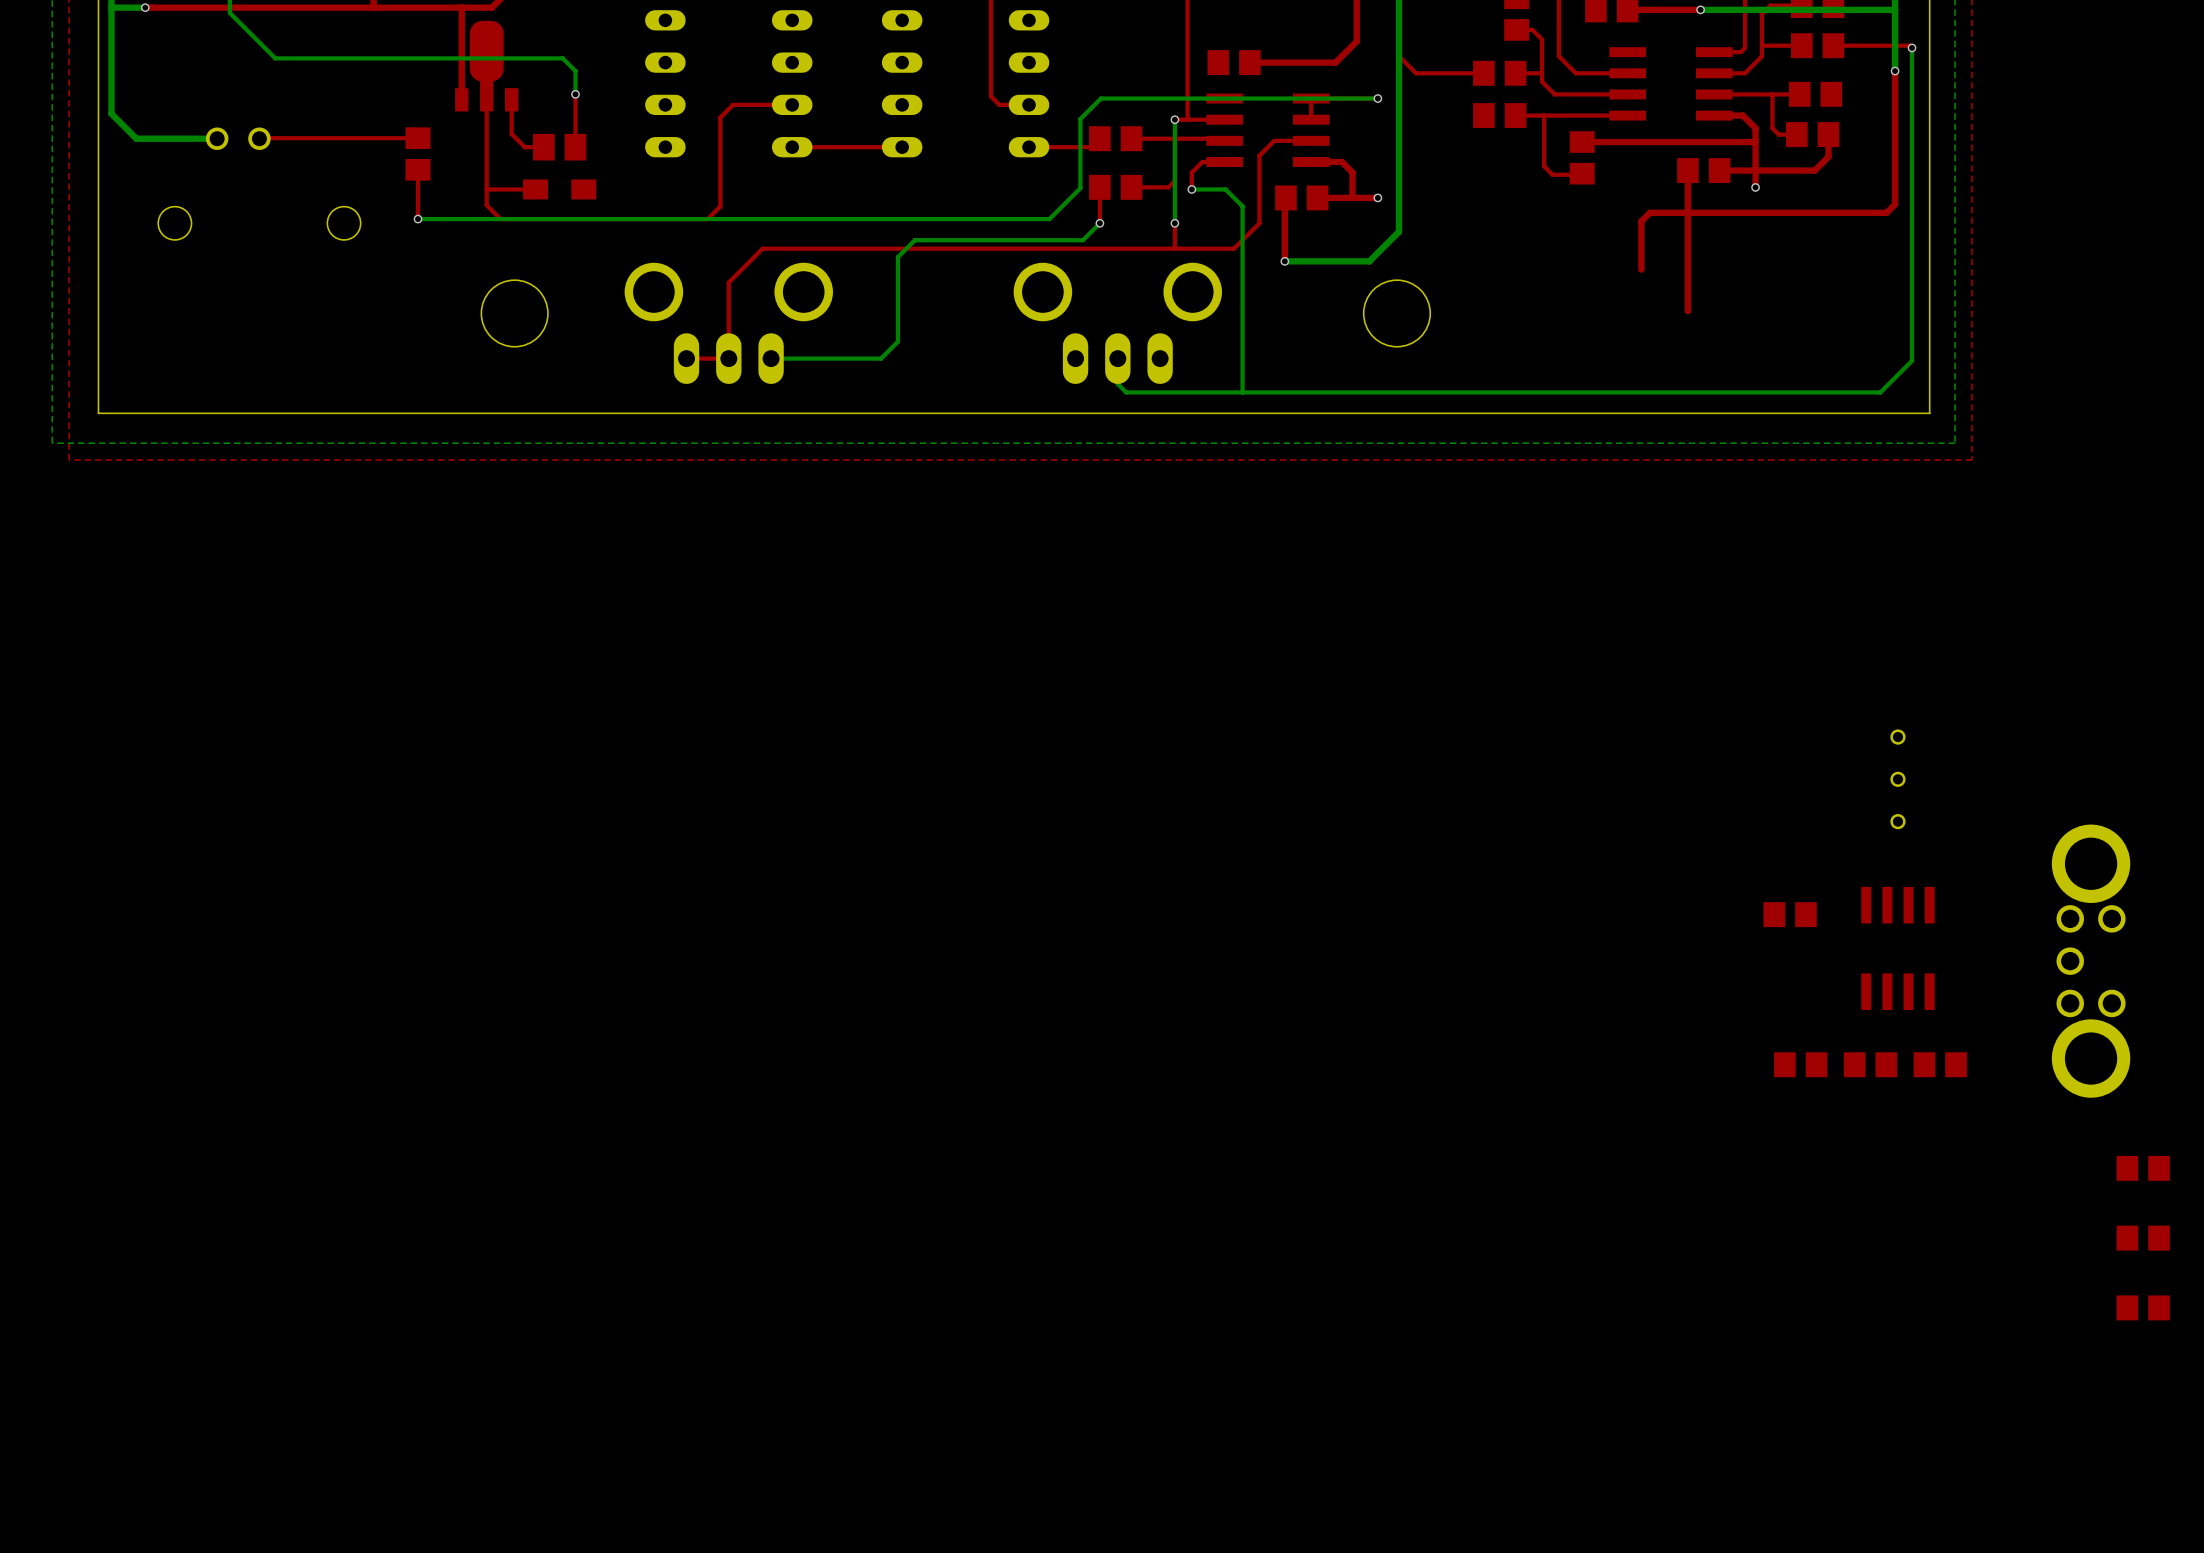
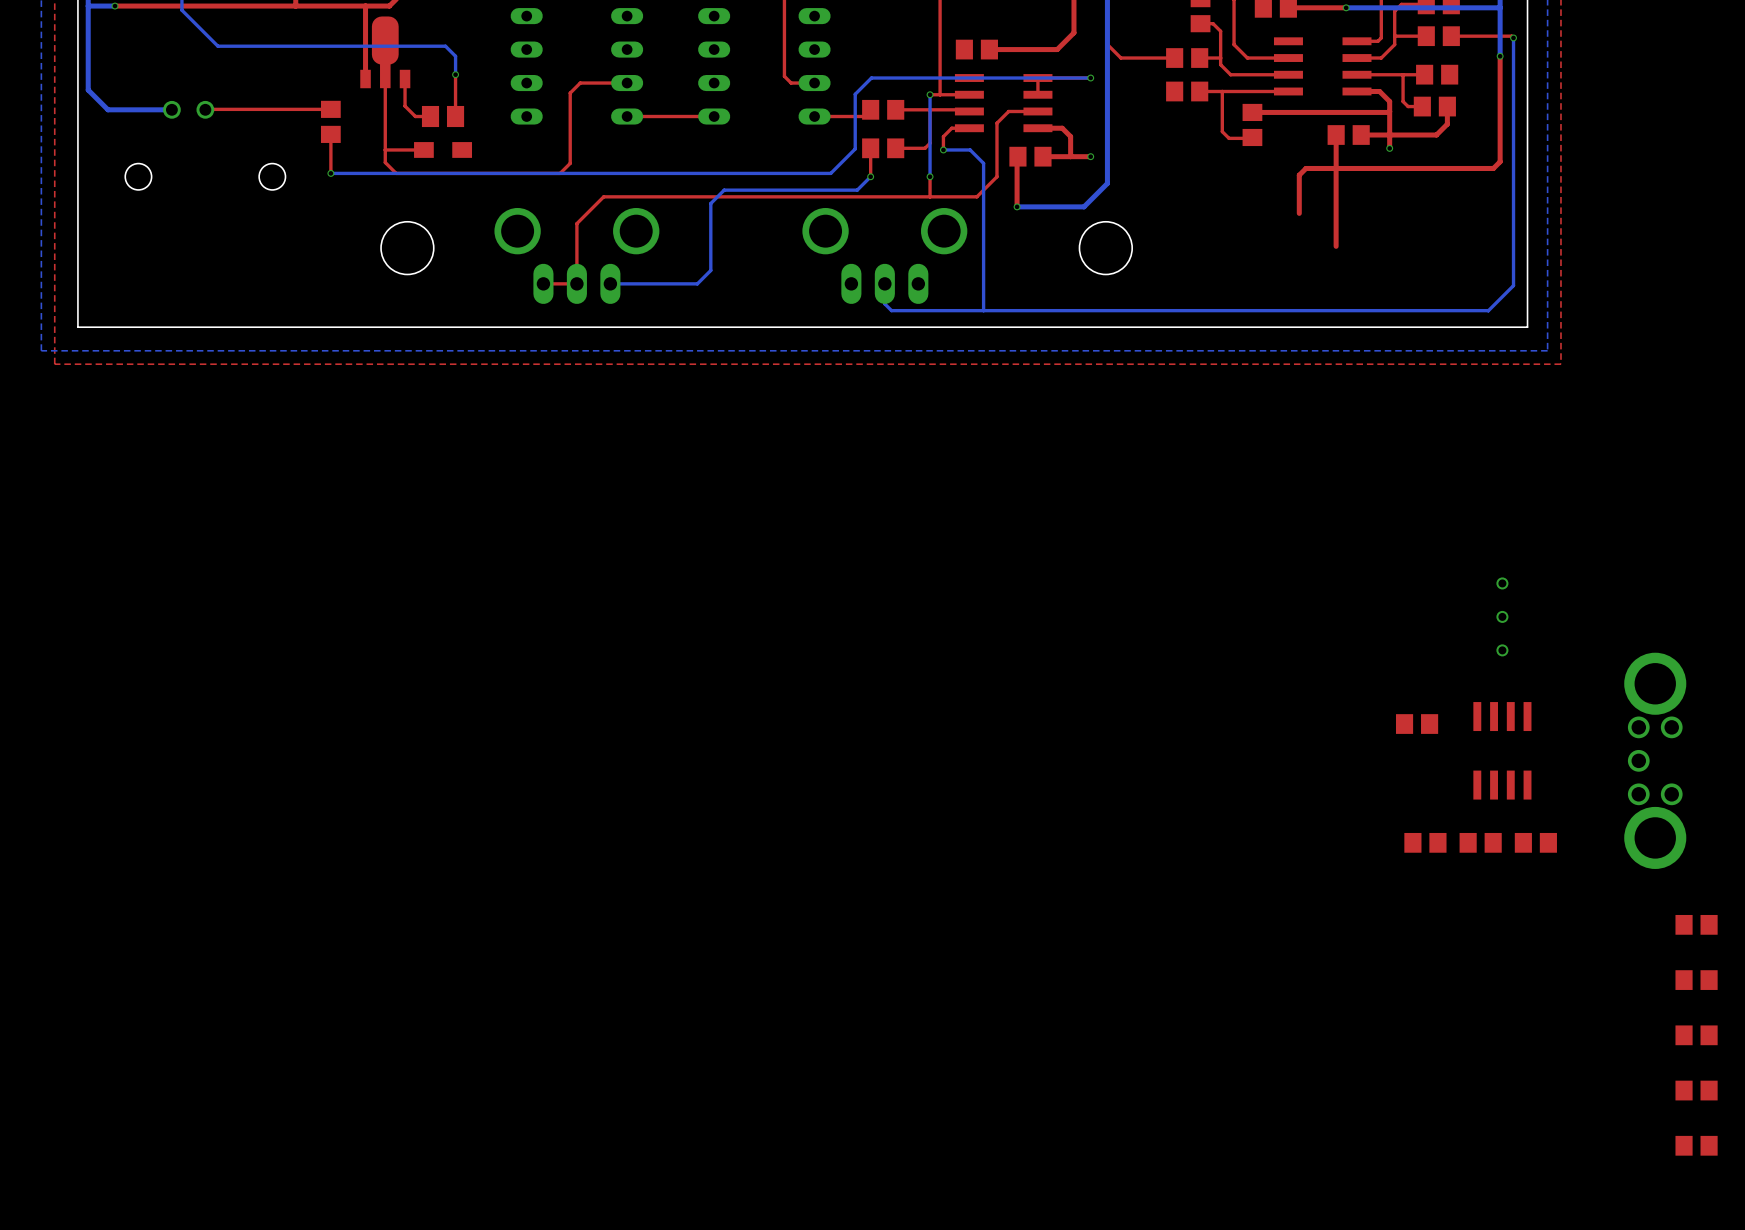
part: none -> (1696, 1090)
part: none -> (1696, 1145)

